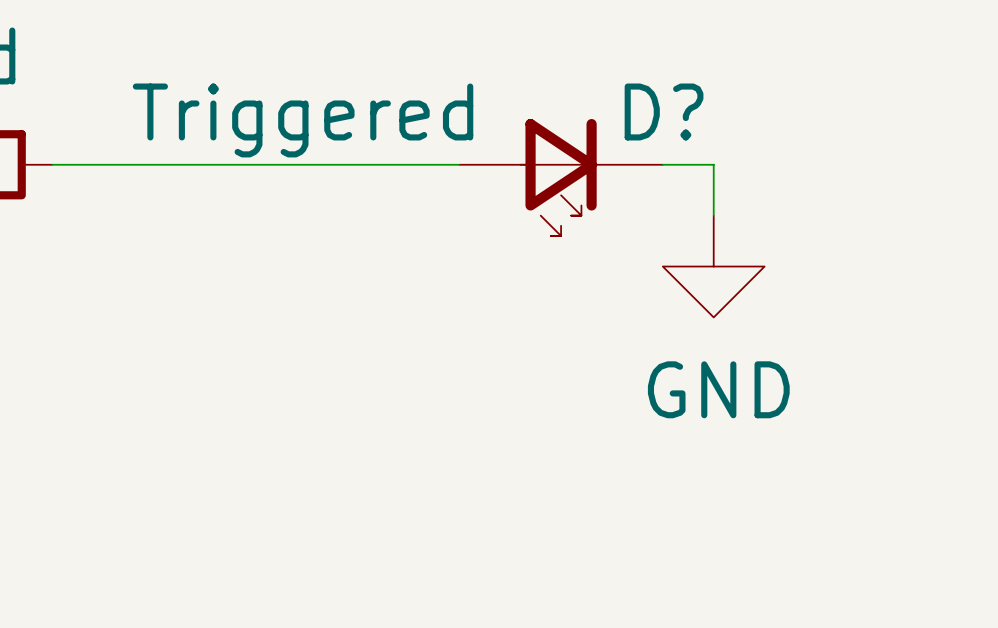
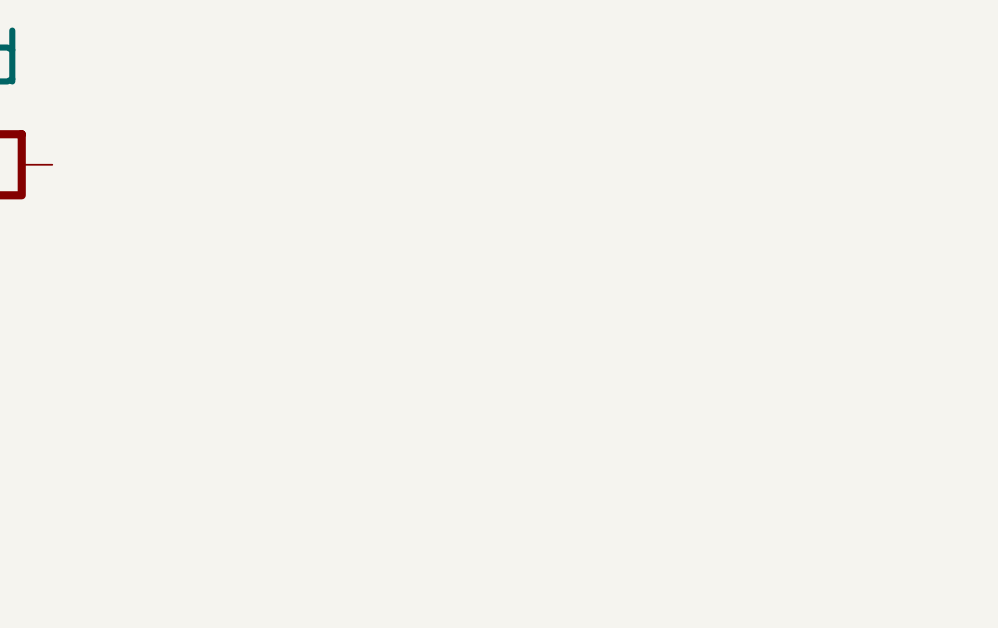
wire: (52, 164) (459, 164) -> none
wire: (662, 164) (713, 164) (713, 215) -> none
D?: Triggered (561, 177) -> none
power symbol: GND (713, 266) -> none

